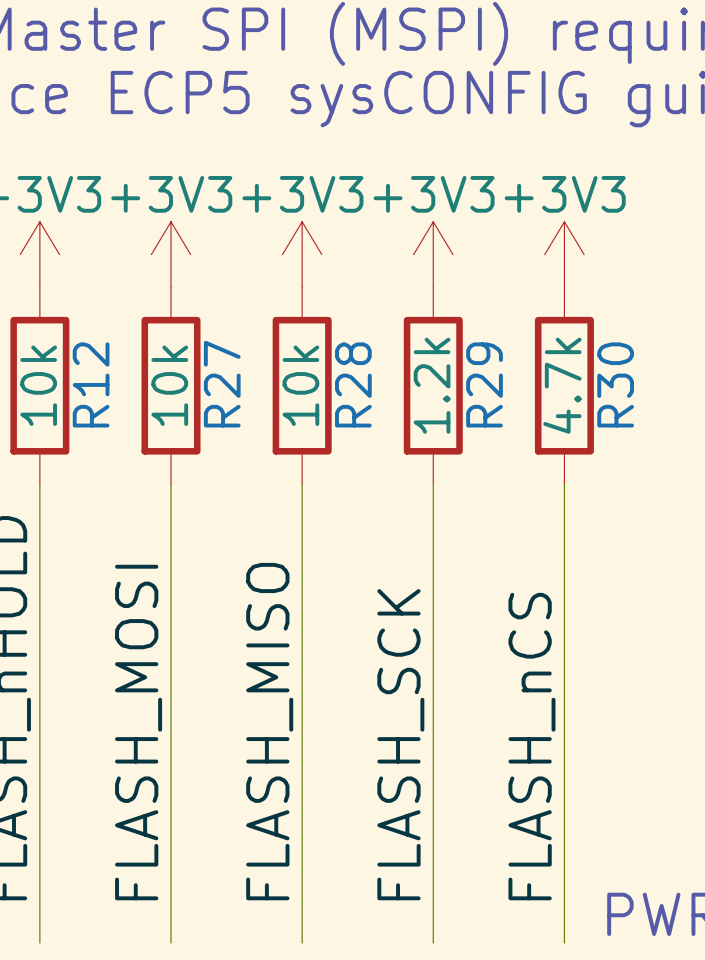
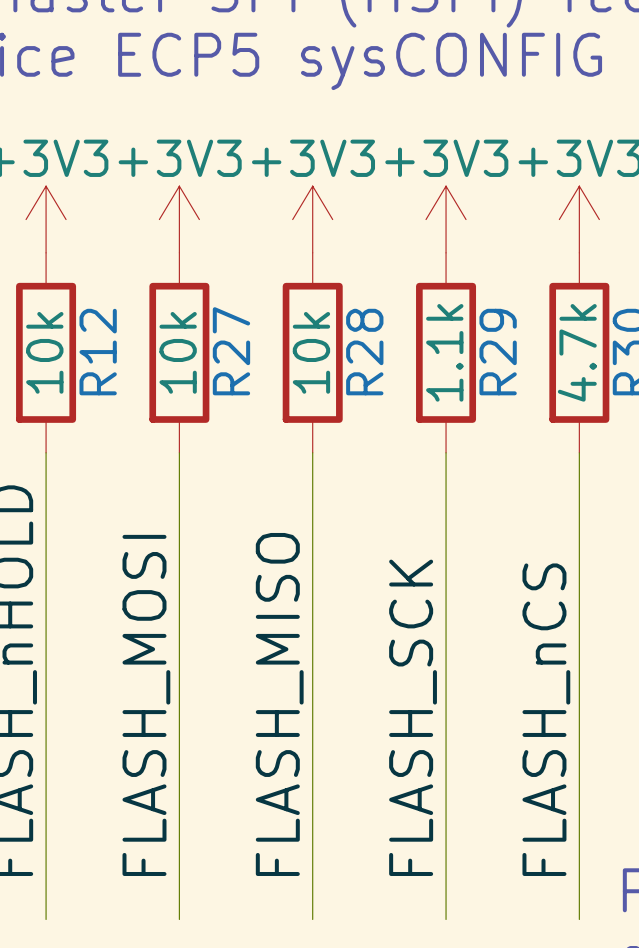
R29 value: 1.2k (432, 385) -> 1.1k (444, 352)

